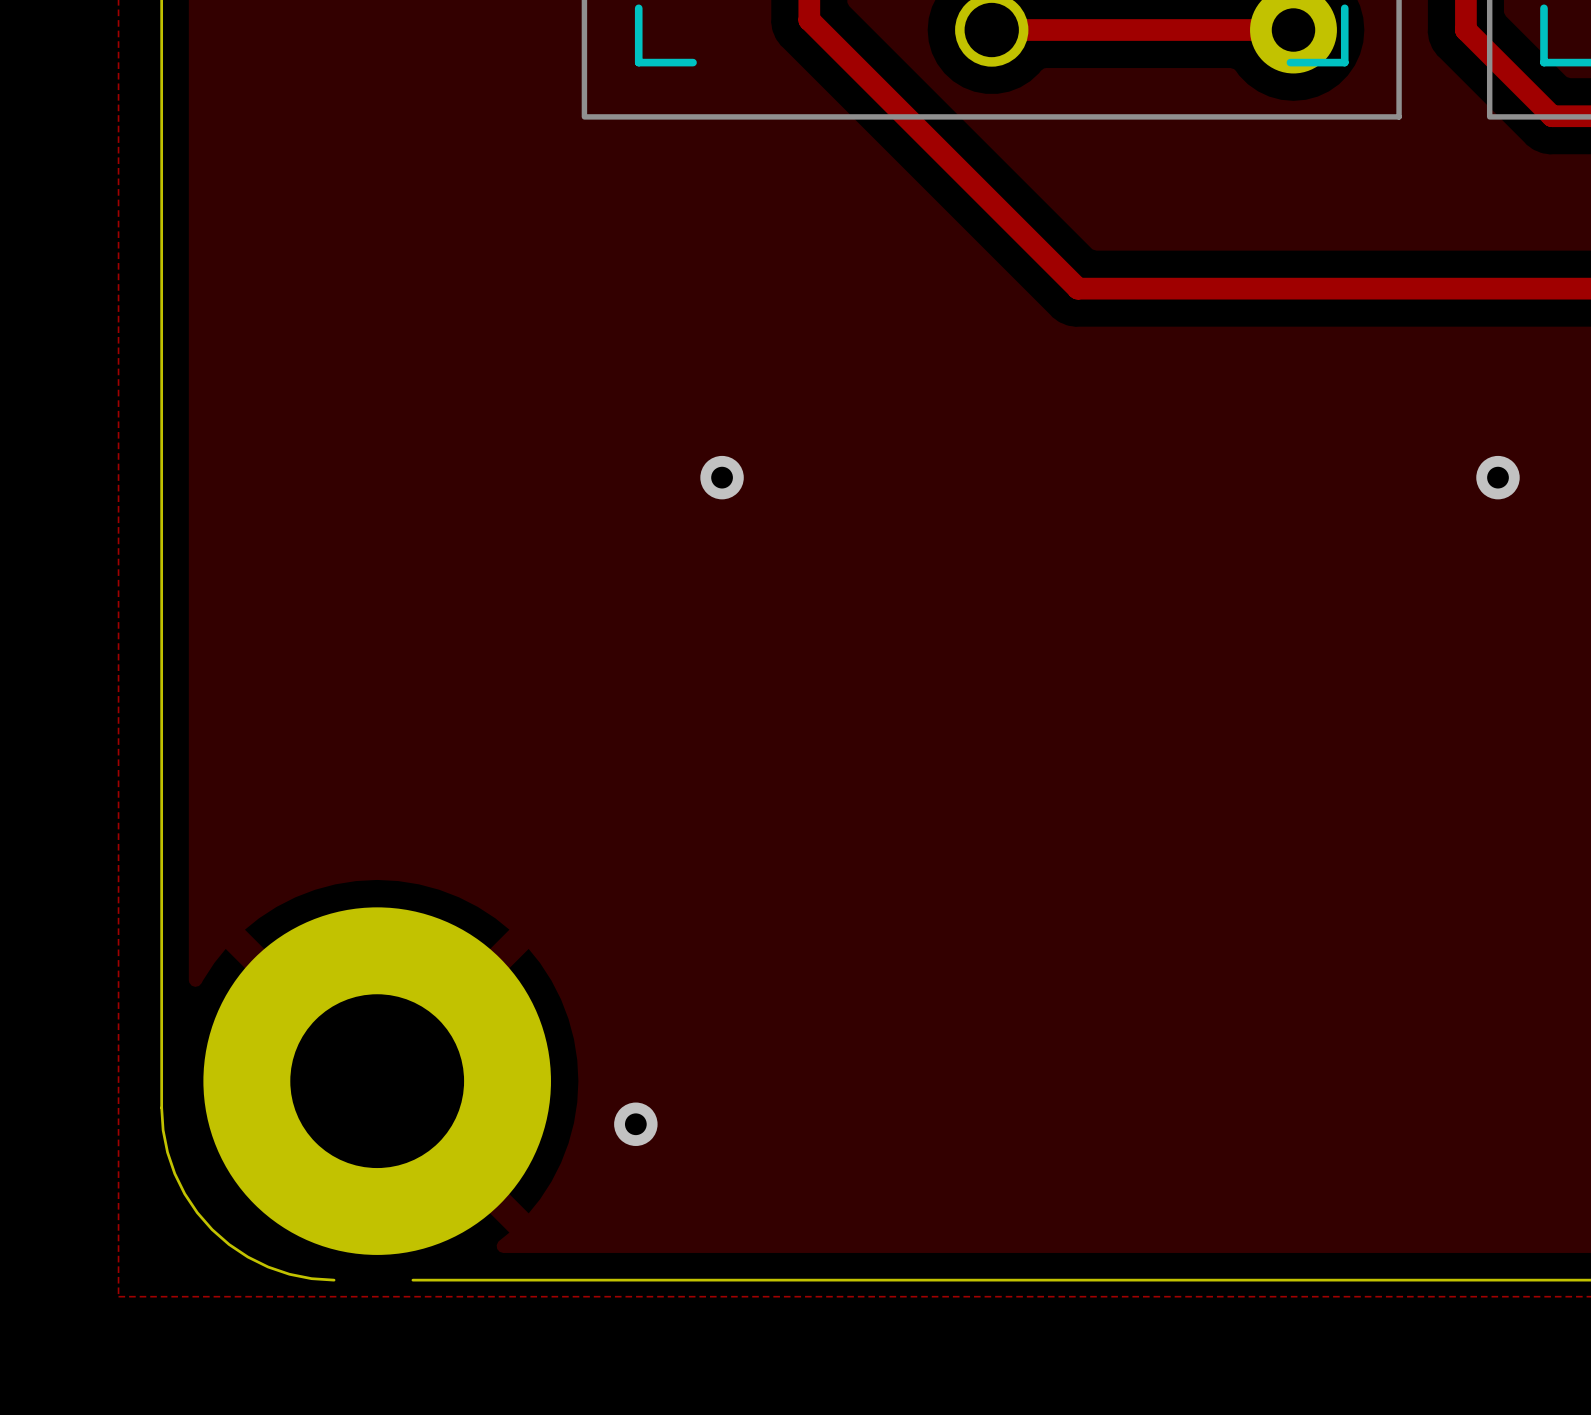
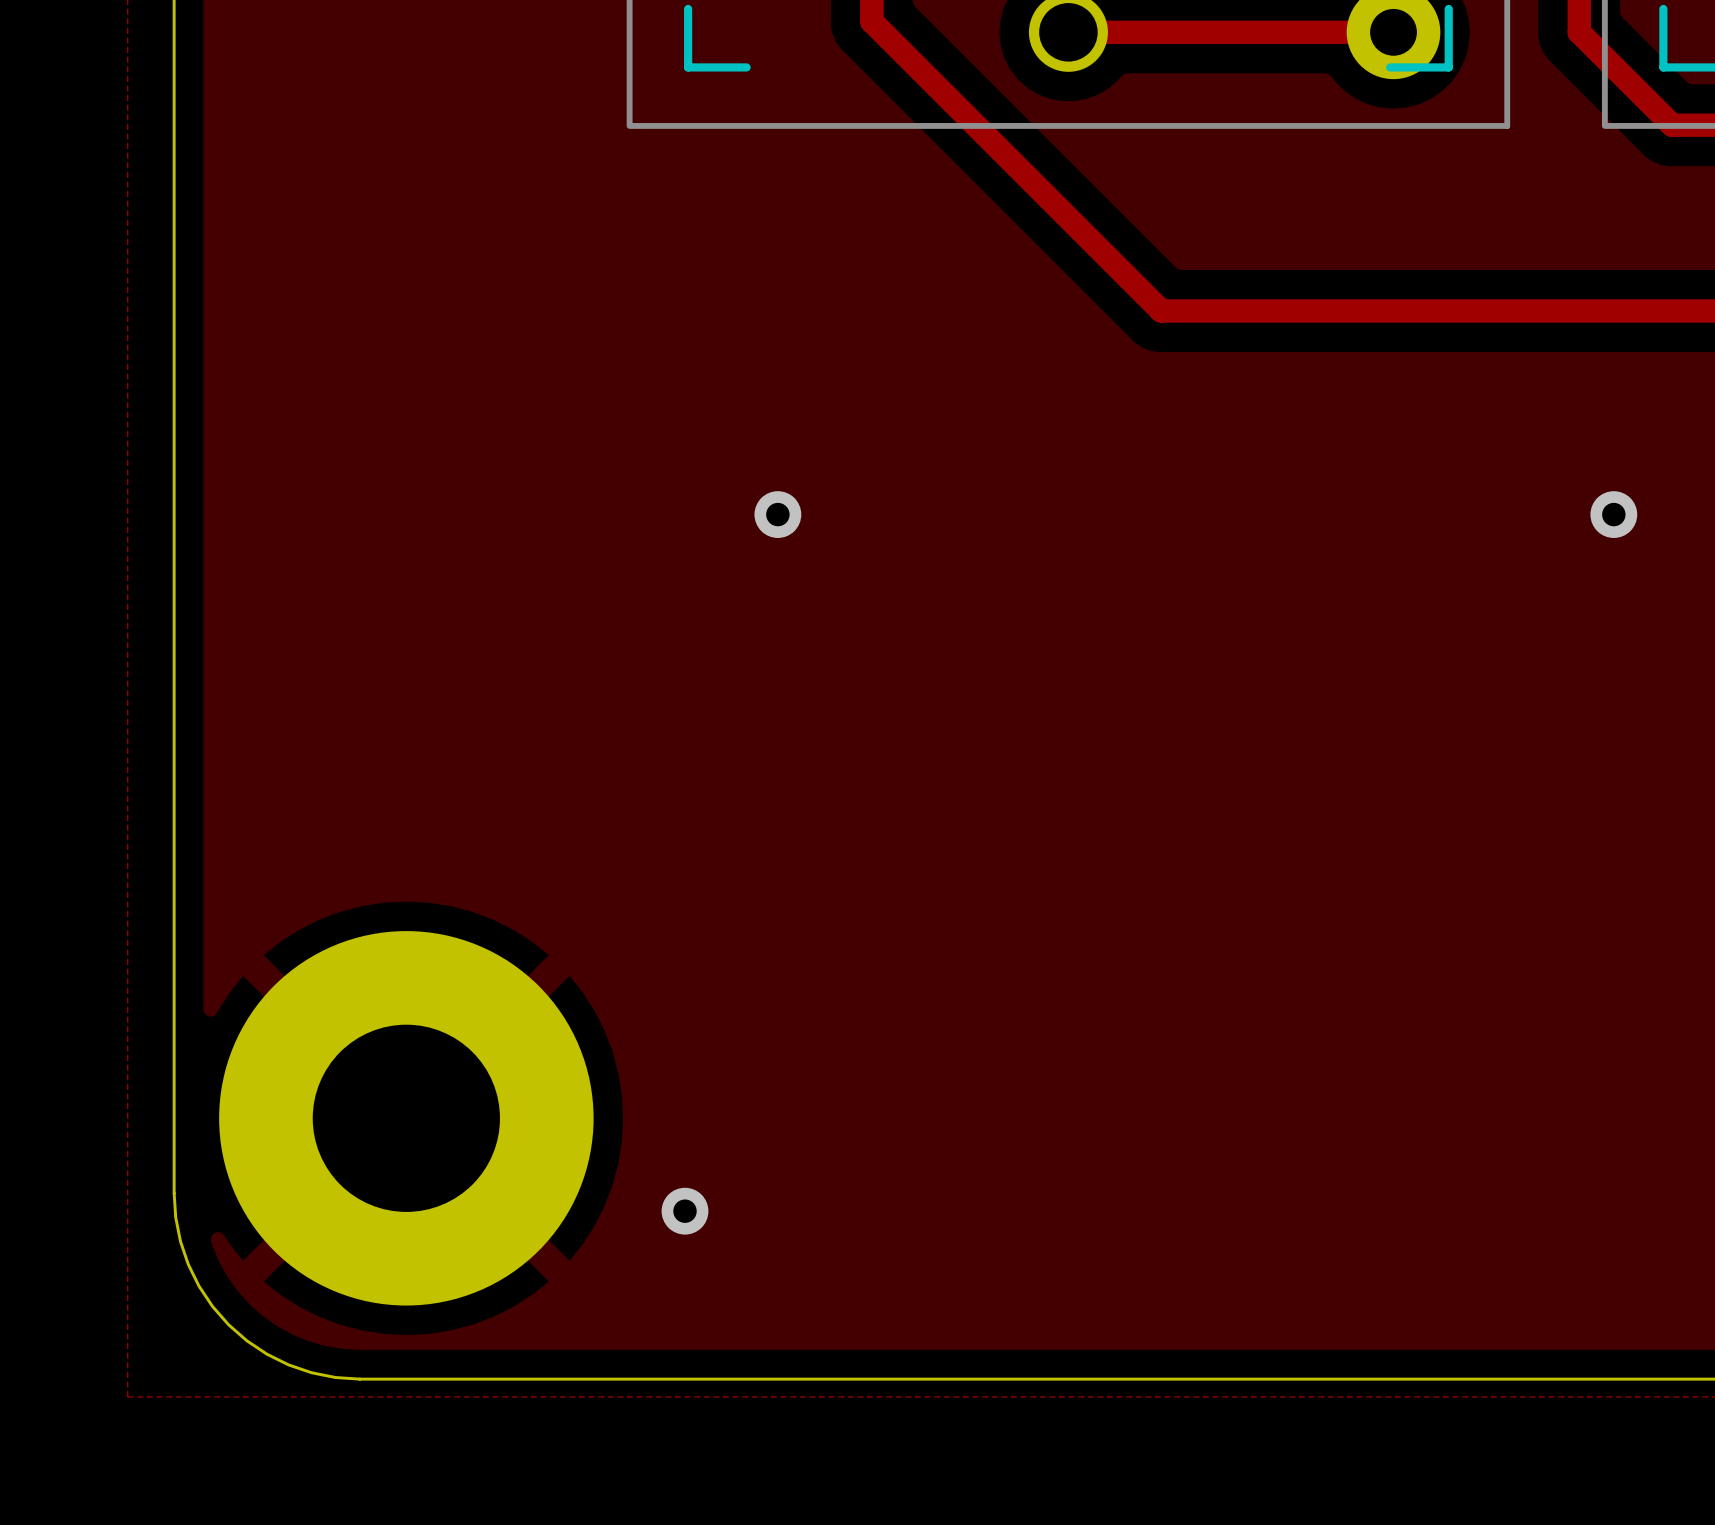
part position: (377, 1081) -> (406, 1118)
board edge: none -> (359, 1379) (444, 1379)

